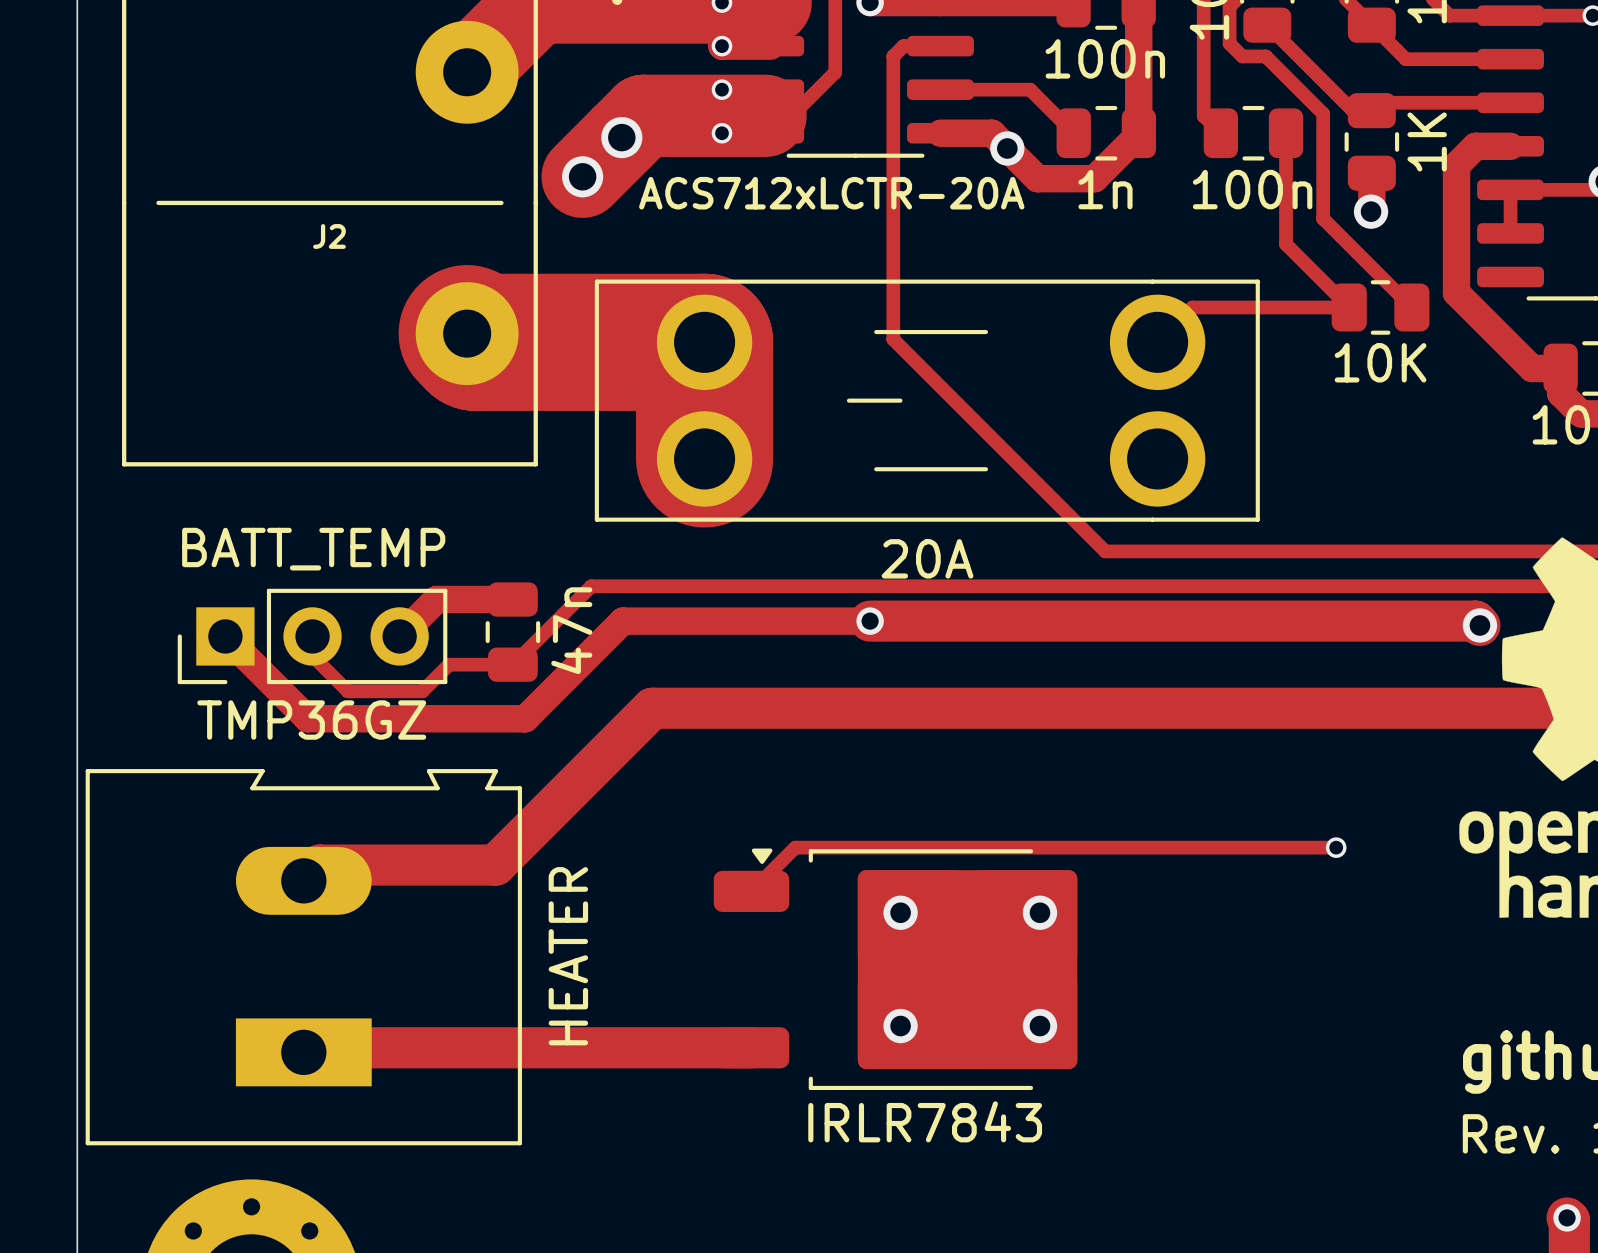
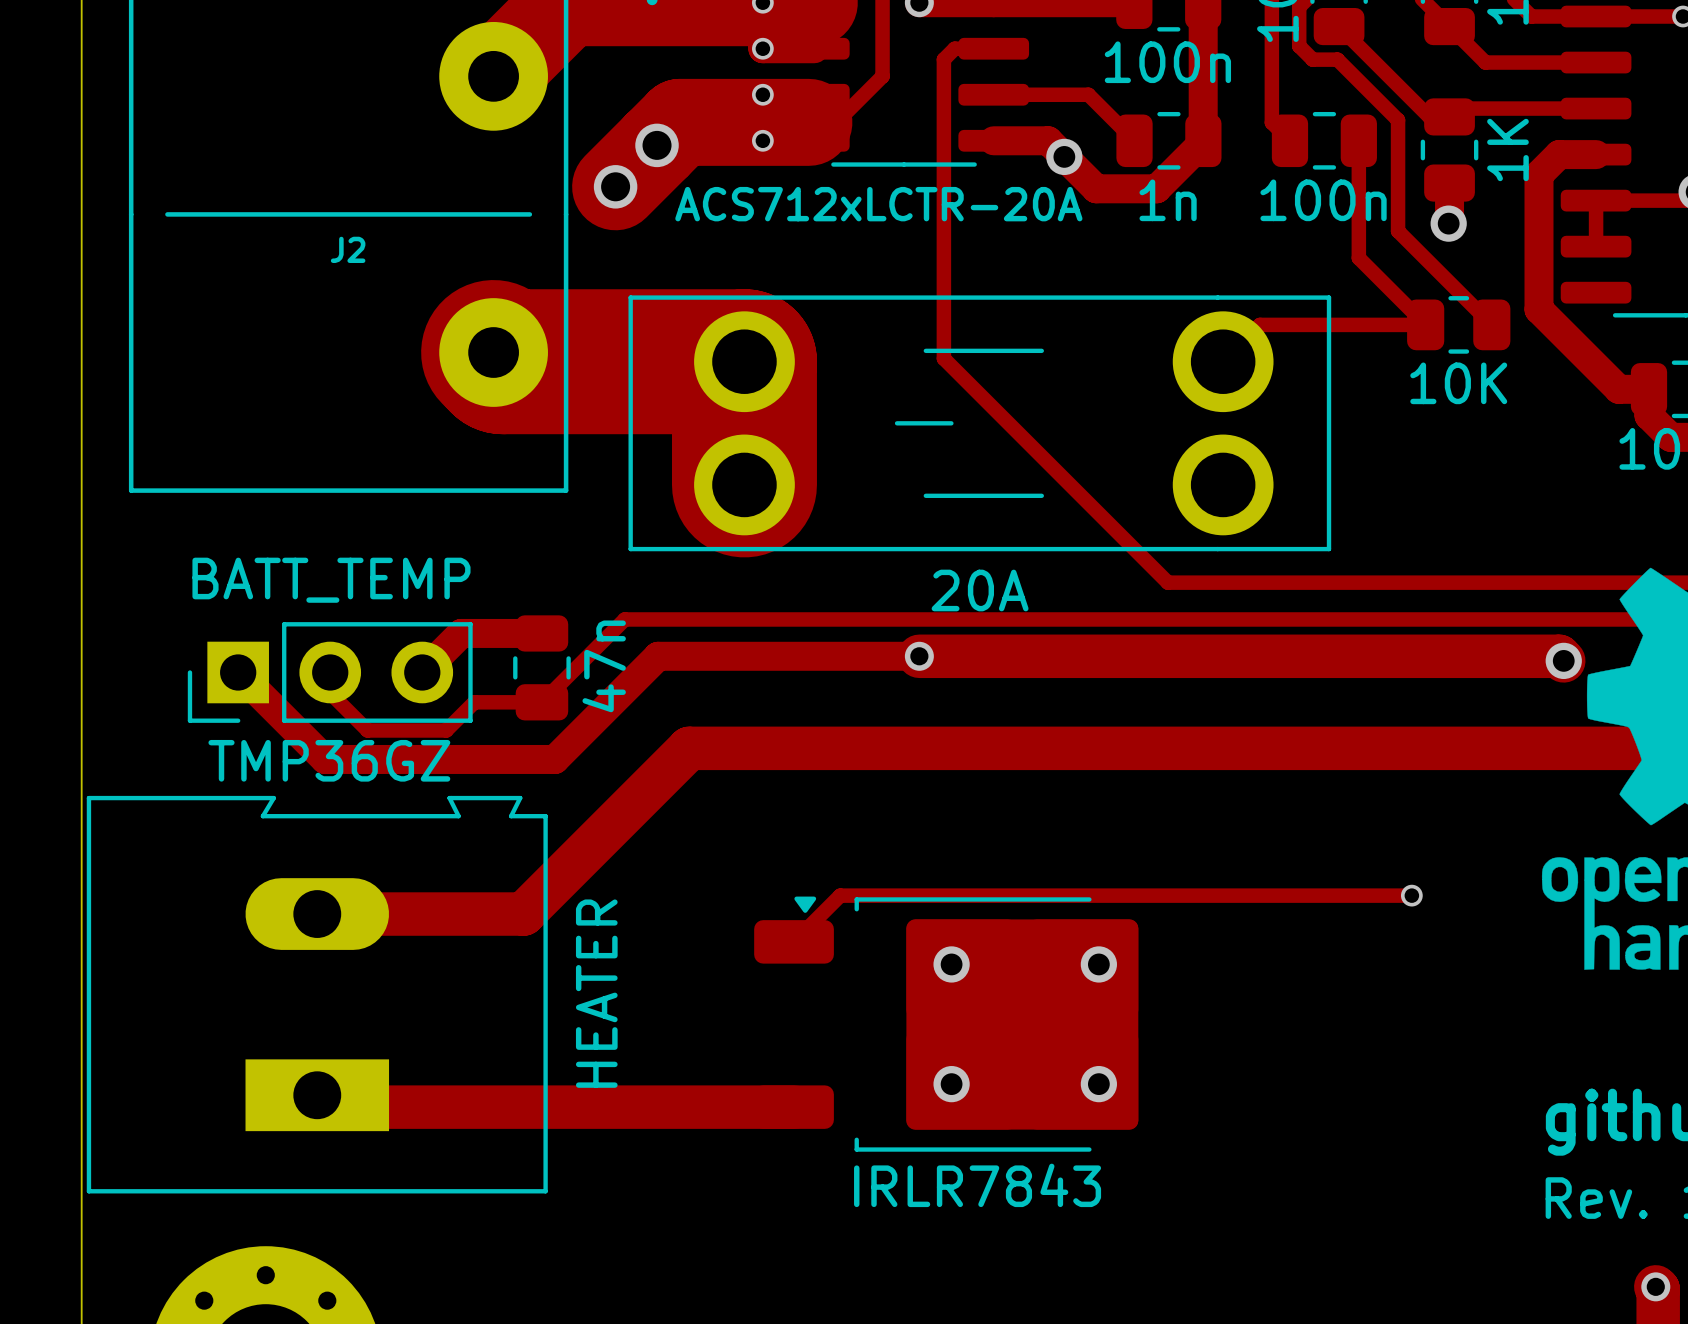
part position: (303, 957) -> (317, 994)

